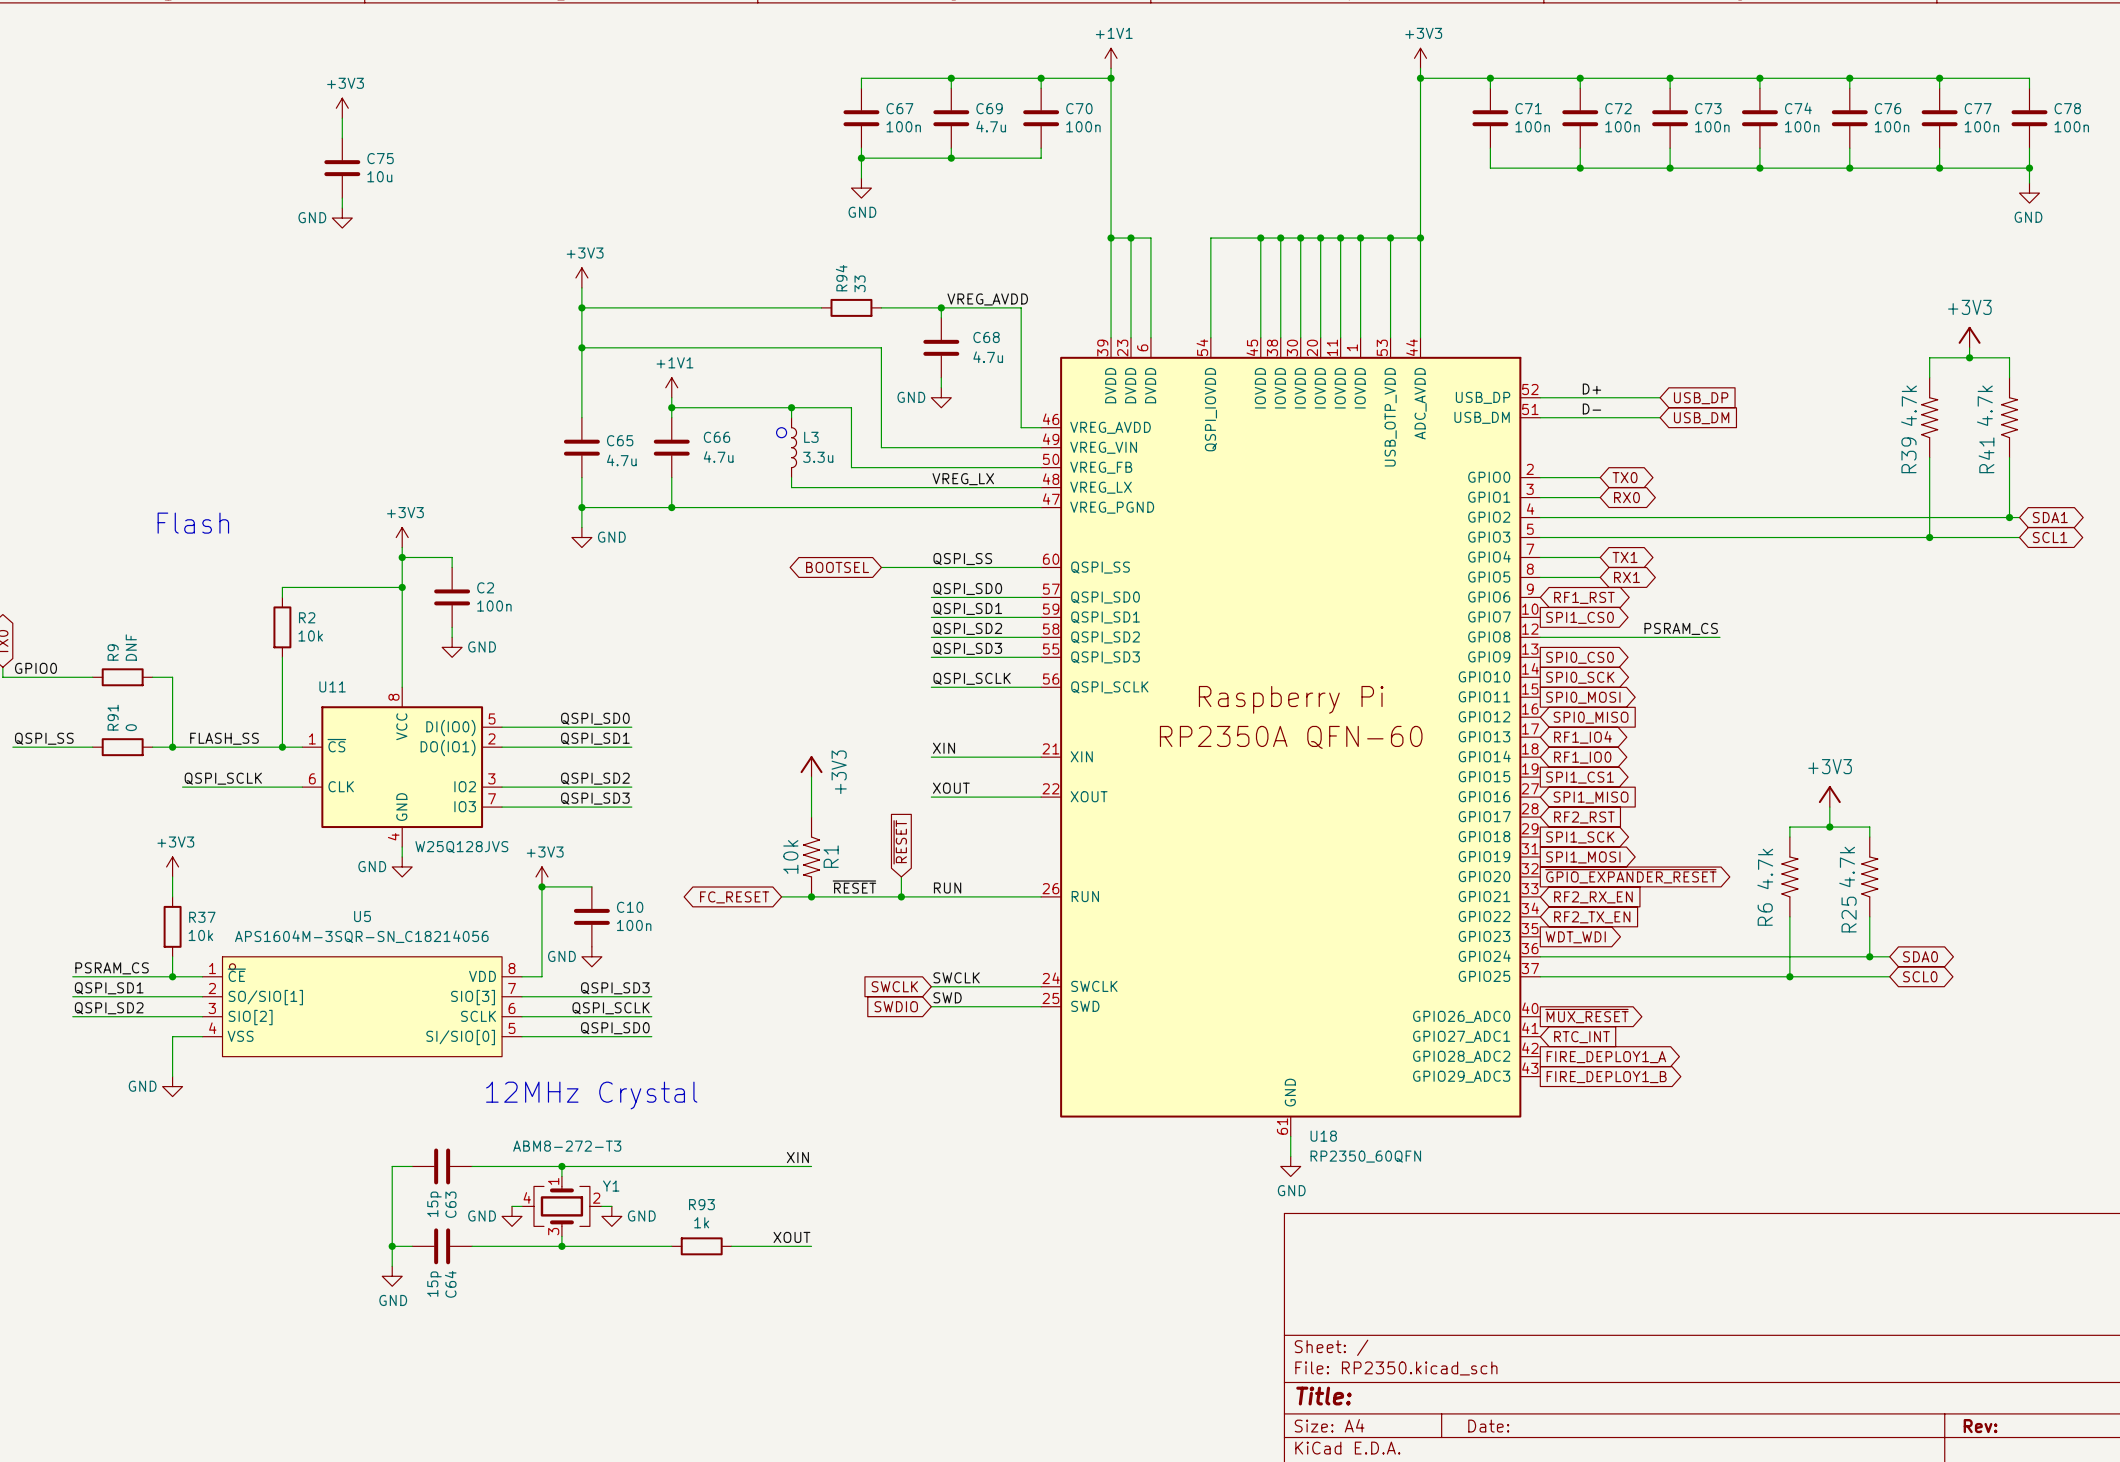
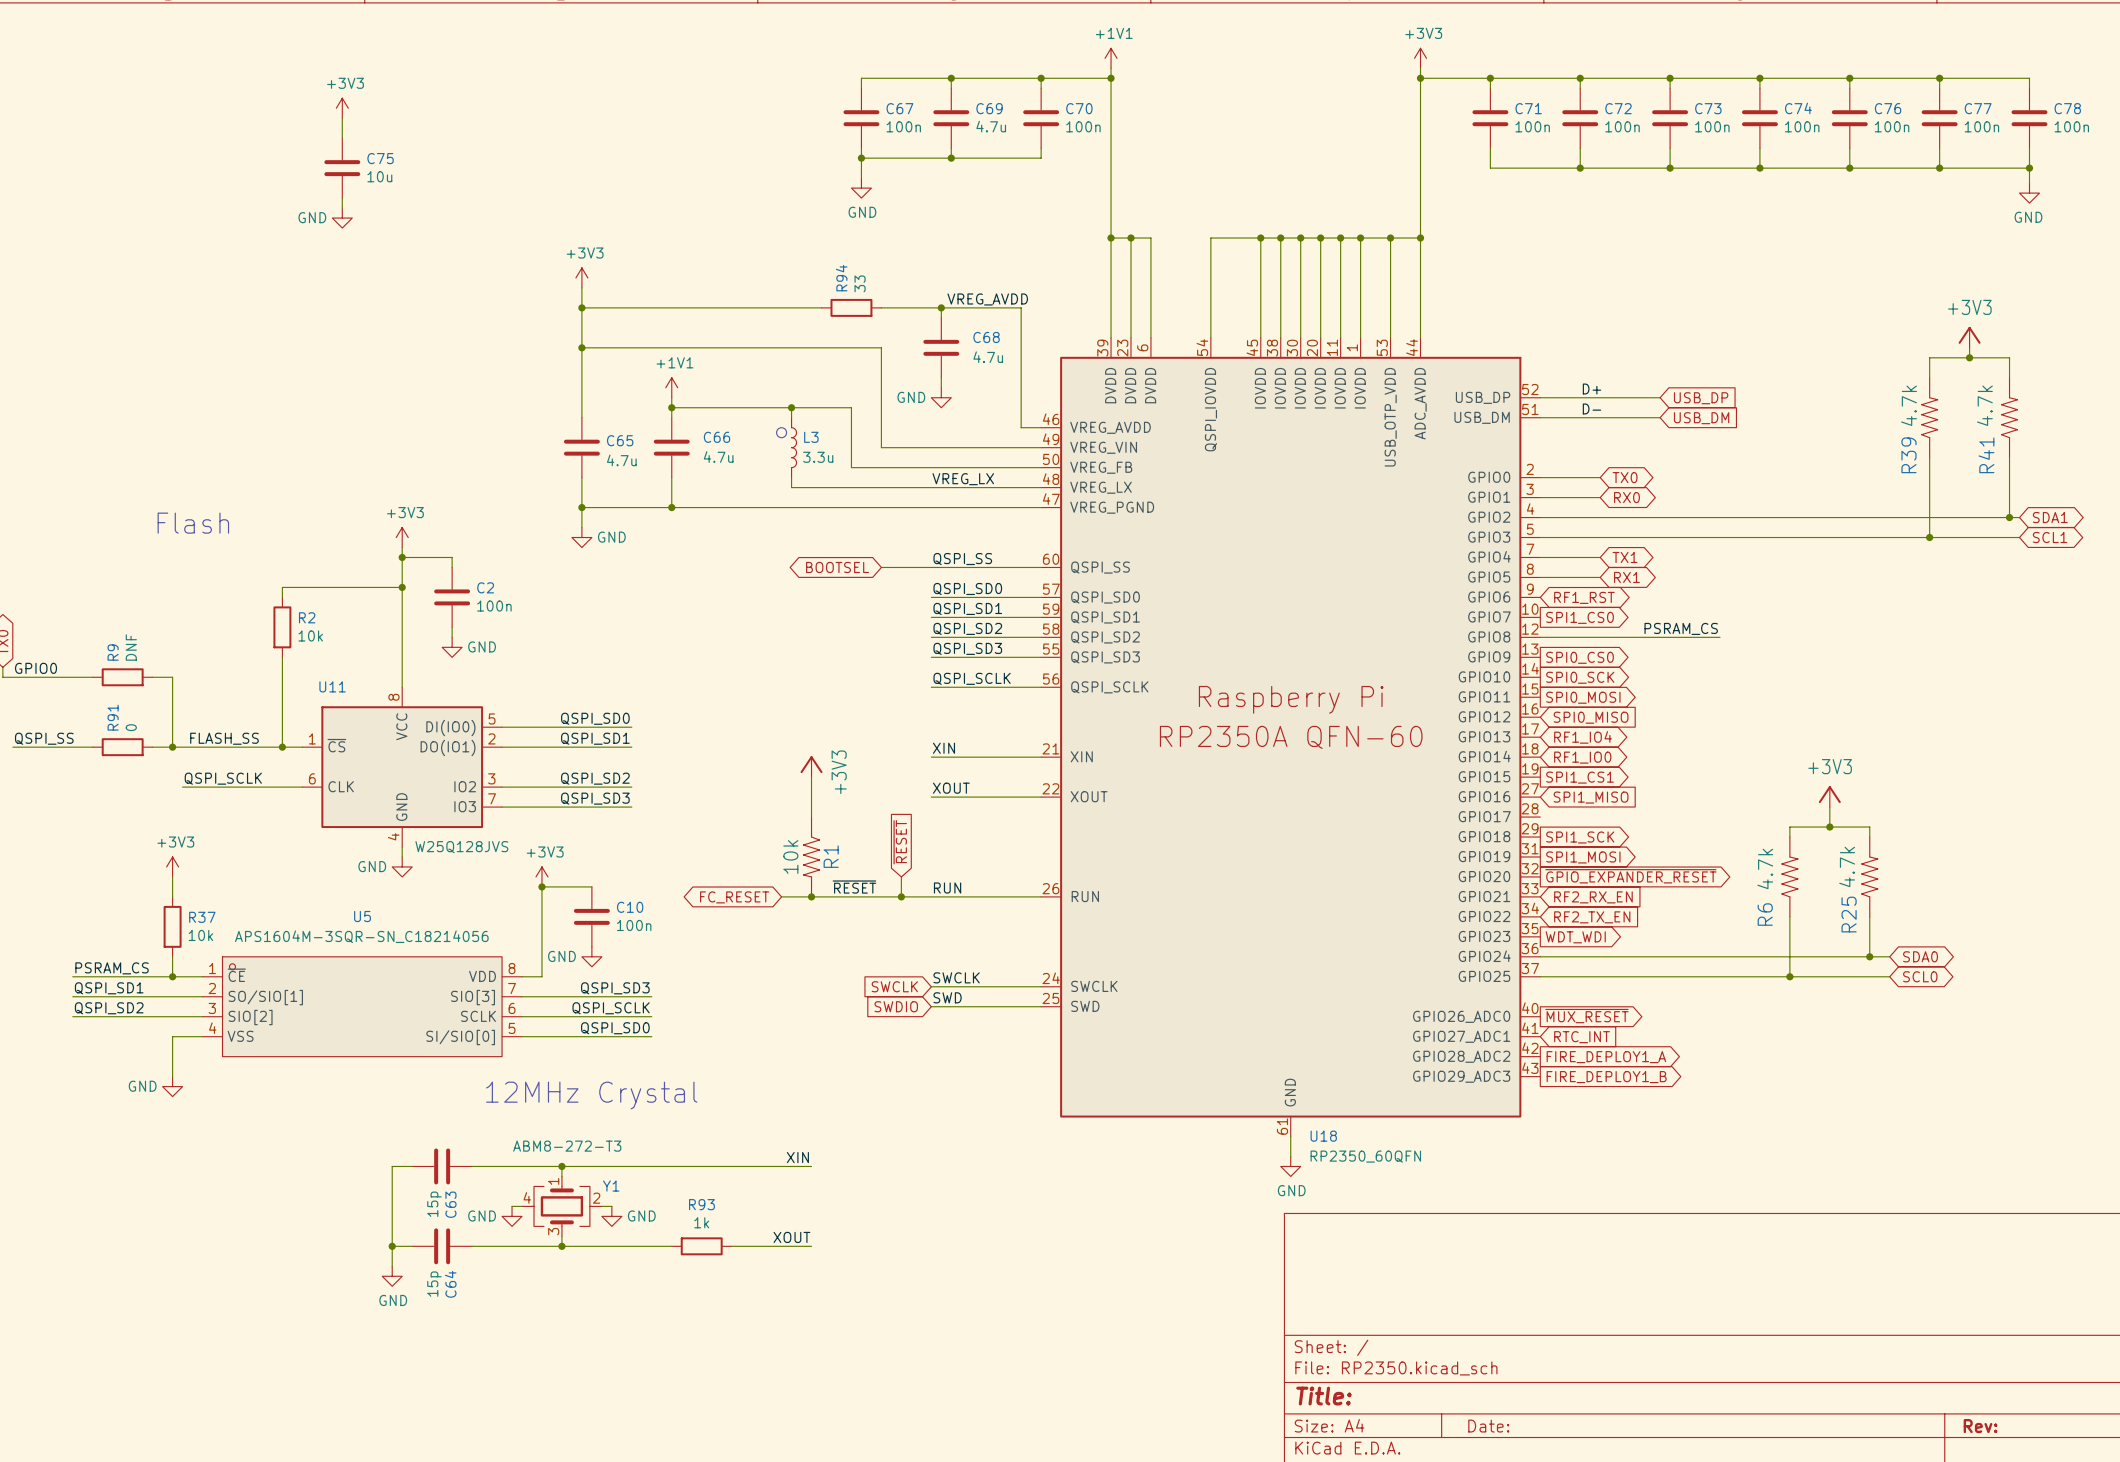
global label: RF2_RST (1584, 817) -> none

